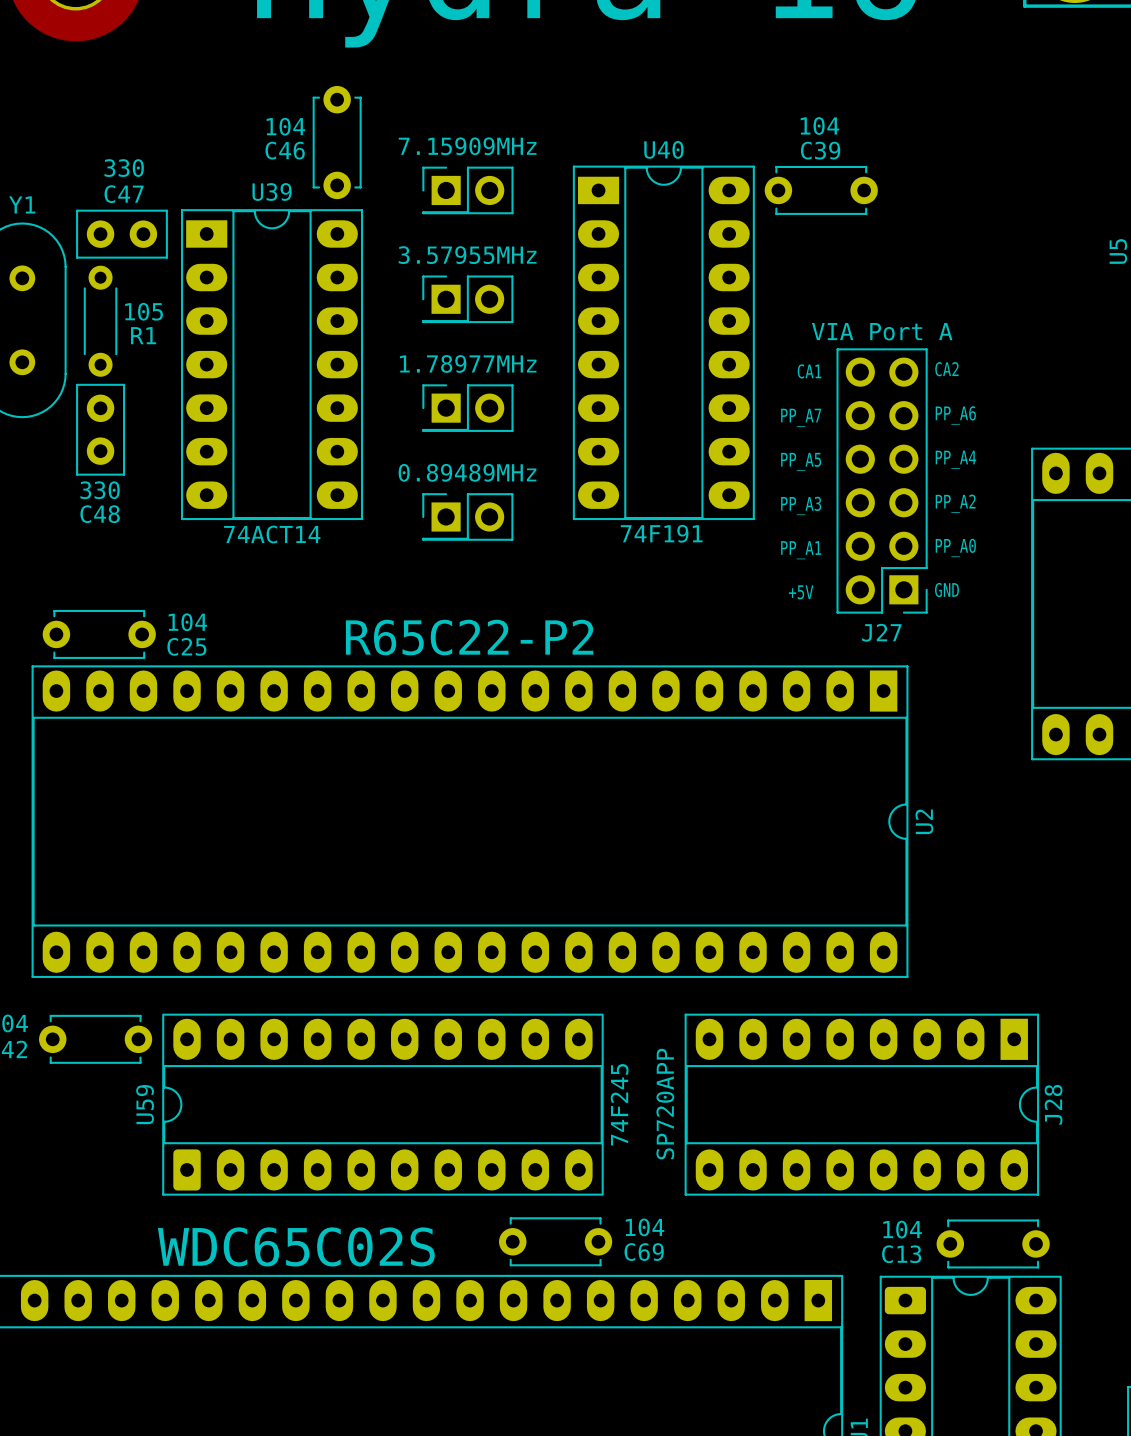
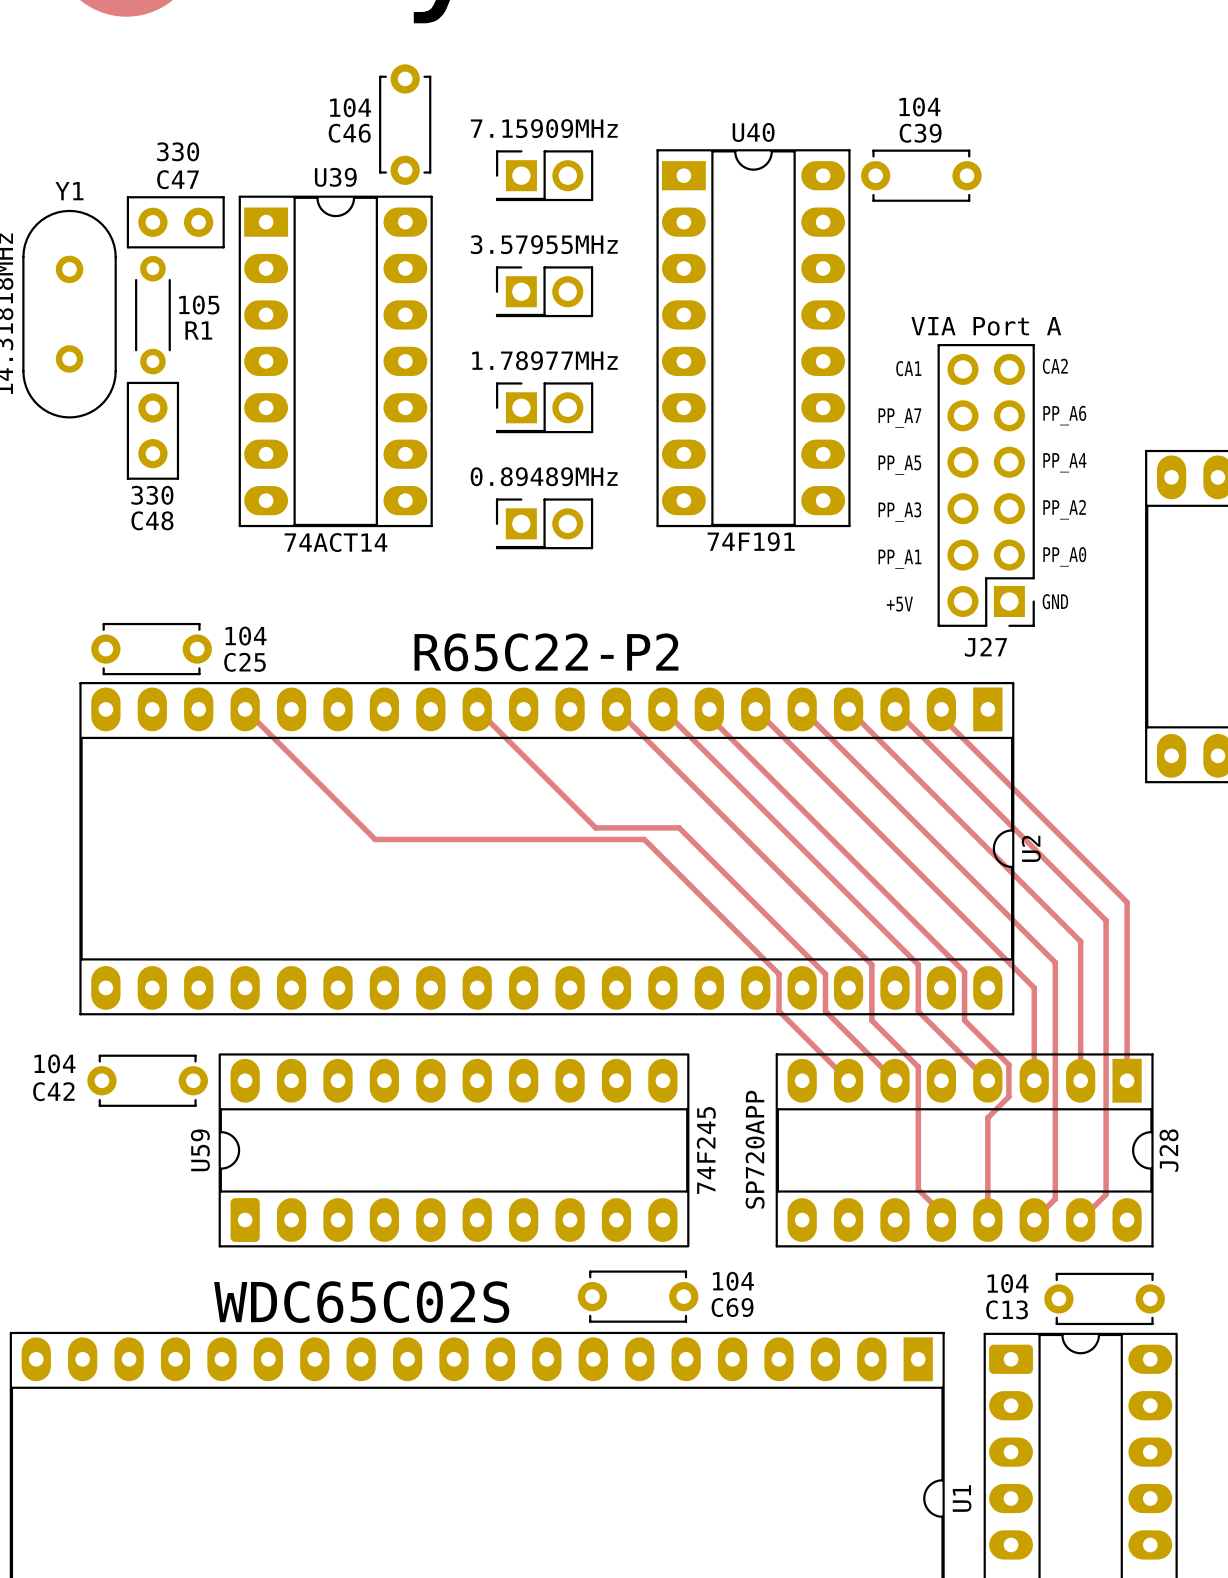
track: none -> (245, 709) (375, 839) (644, 839) (779, 974) (779, 1011) (848, 1080)
track: none -> (477, 709) (595, 827) (679, 827) (825, 974) (825, 1011) (894, 1080)
track: none -> (616, 709) (871, 964) (871, 1020) (918, 1067) (918, 1189) (941, 1212) (941, 1220)
track: none -> (662, 709) (918, 964) (918, 1011) (987, 1080)
track: none -> (709, 709) (709, 716) (964, 971) (964, 1020) (1008, 1064) (1008, 1096) (987, 1117) (987, 1220)
track: none -> (755, 709) (1034, 987) (1034, 1080)
track: none -> (802, 709) (1055, 962) (1055, 1198) (1034, 1220)
track: none -> (848, 709) (1080, 941) (1080, 1080)
track: none -> (894, 709) (1106, 920) (1106, 1194) (1080, 1220)
track: none -> (941, 709) (941, 716) (1127, 902) (1127, 1080)

